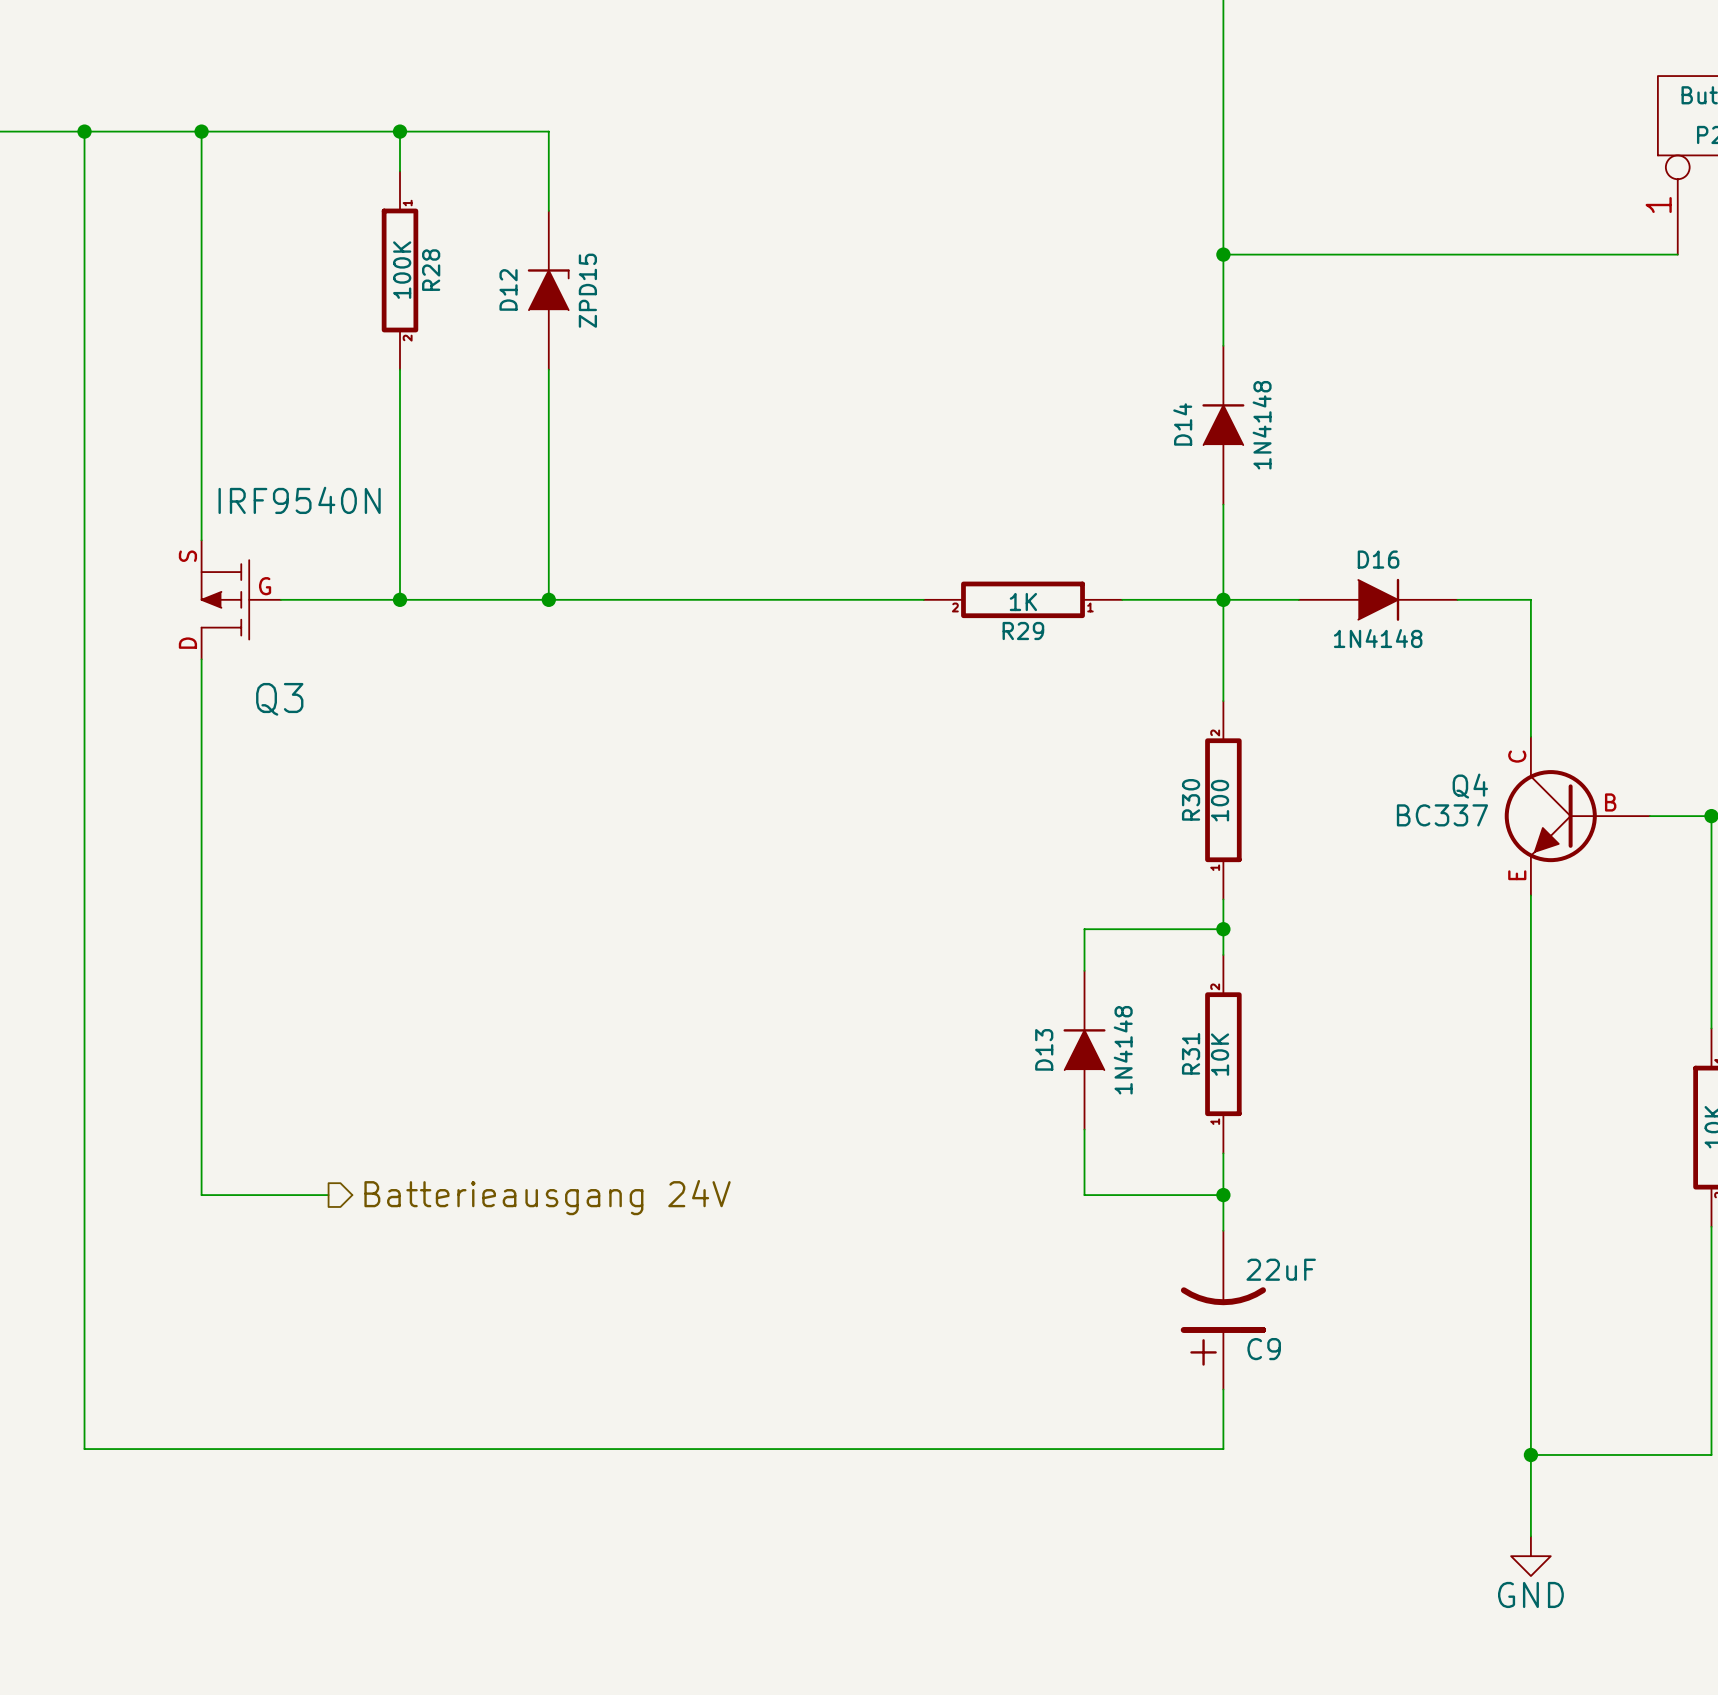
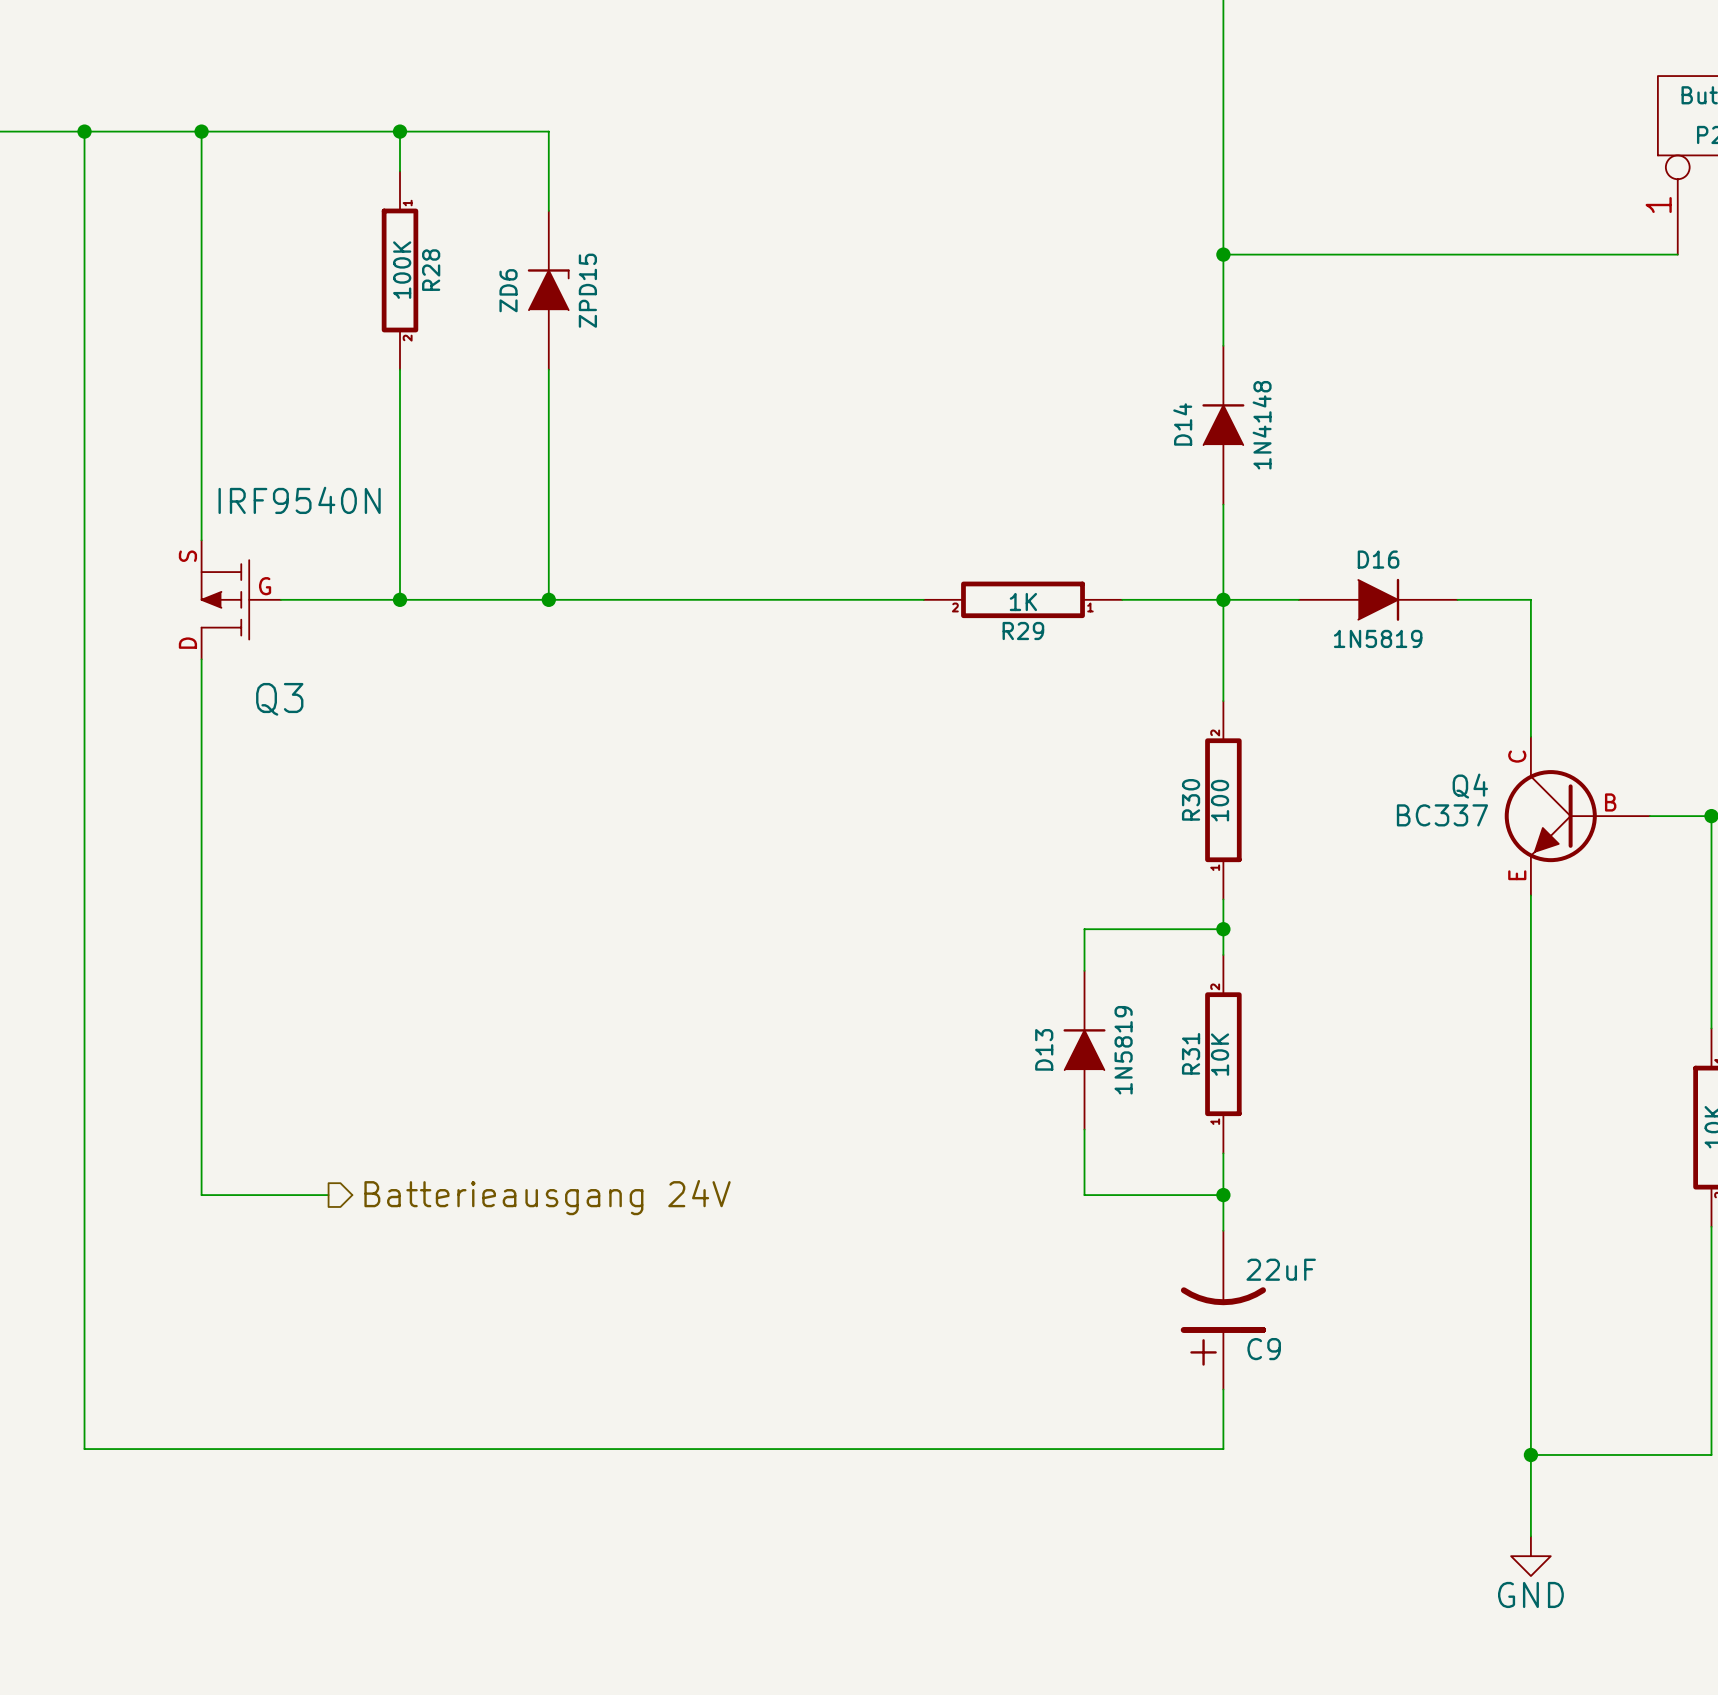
D12 name: D12 (508, 289) -> ZD6 (508, 290)
D16 value: 1N4148 (1378, 638) -> 1N5819 (1378, 638)
D13 value: 1N4148 (1123, 1050) -> 1N5819 (1123, 1050)

